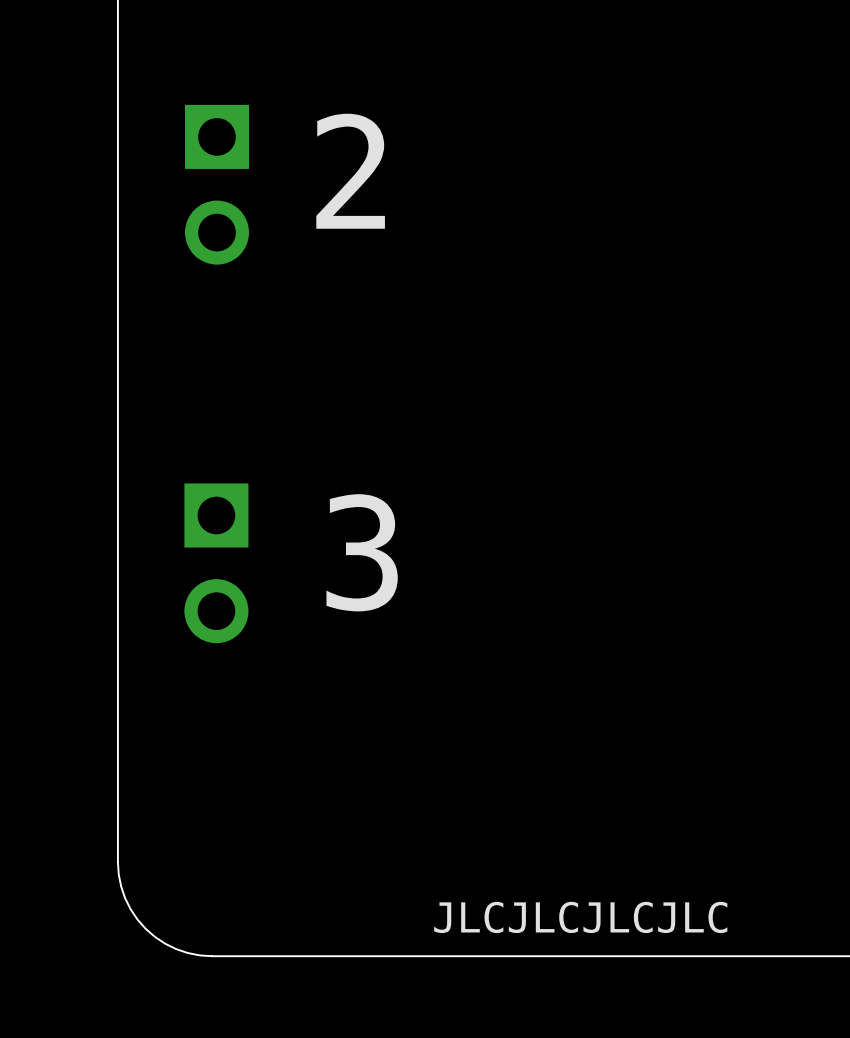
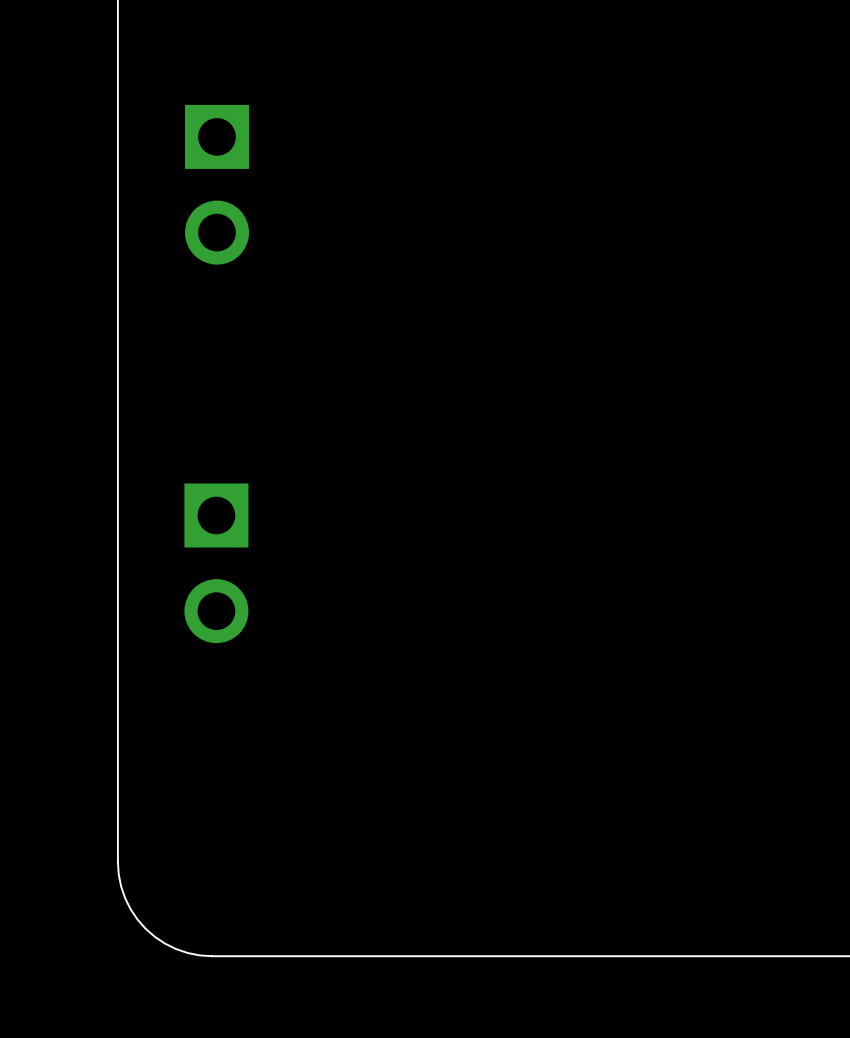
text: 2 (350, 171) -> none
text: 3 (362, 552) -> none
text: JLCJLCJLCJLC (580, 917) -> none

